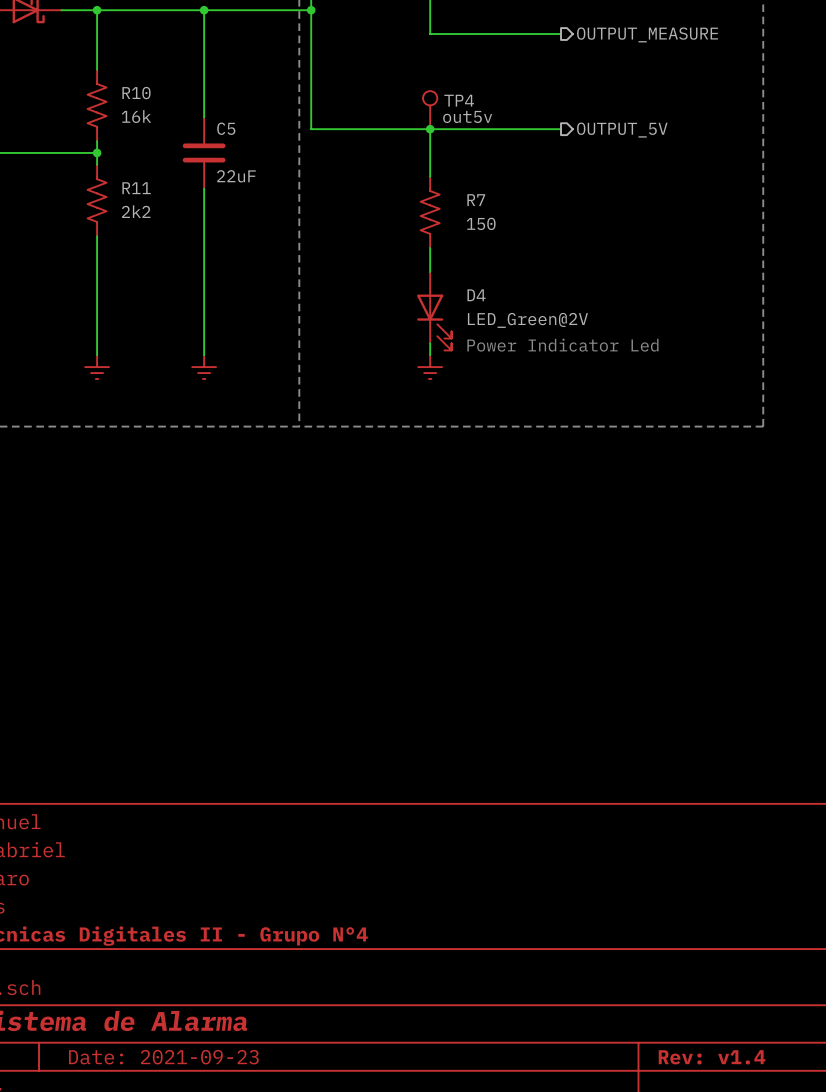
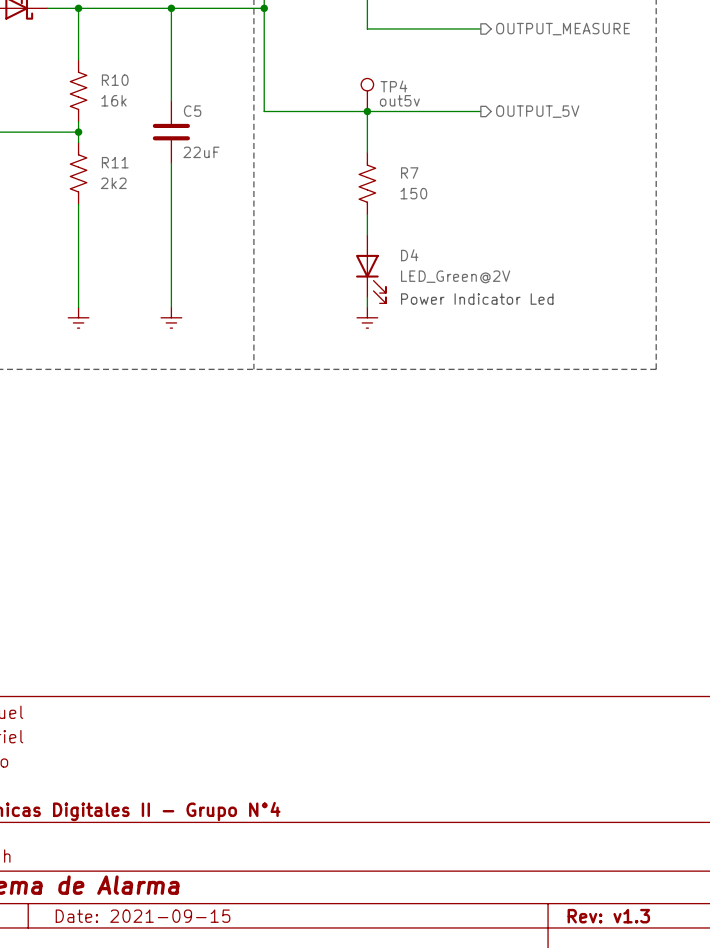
title block: Date: 2021-09-23 (163, 1057) -> Date: 2021-09-15 (143, 916)
title block: Rev: v1.4 (712, 1057) -> Rev: v1.3 (608, 916)

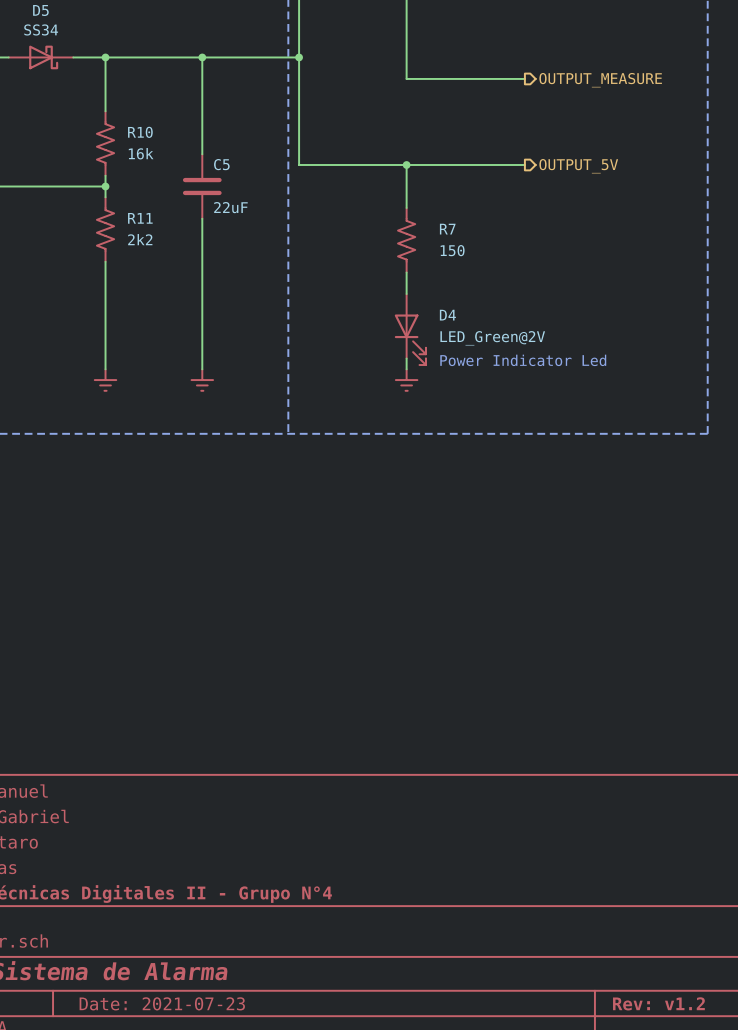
TP4: out5v (367, 94) -> none
title block: Date: 2021-09-15 (143, 916) -> Date: 2021-07-23 (162, 1003)
title block: Rev: v1.3 (608, 916) -> Rev: v1.2 (658, 1003)

